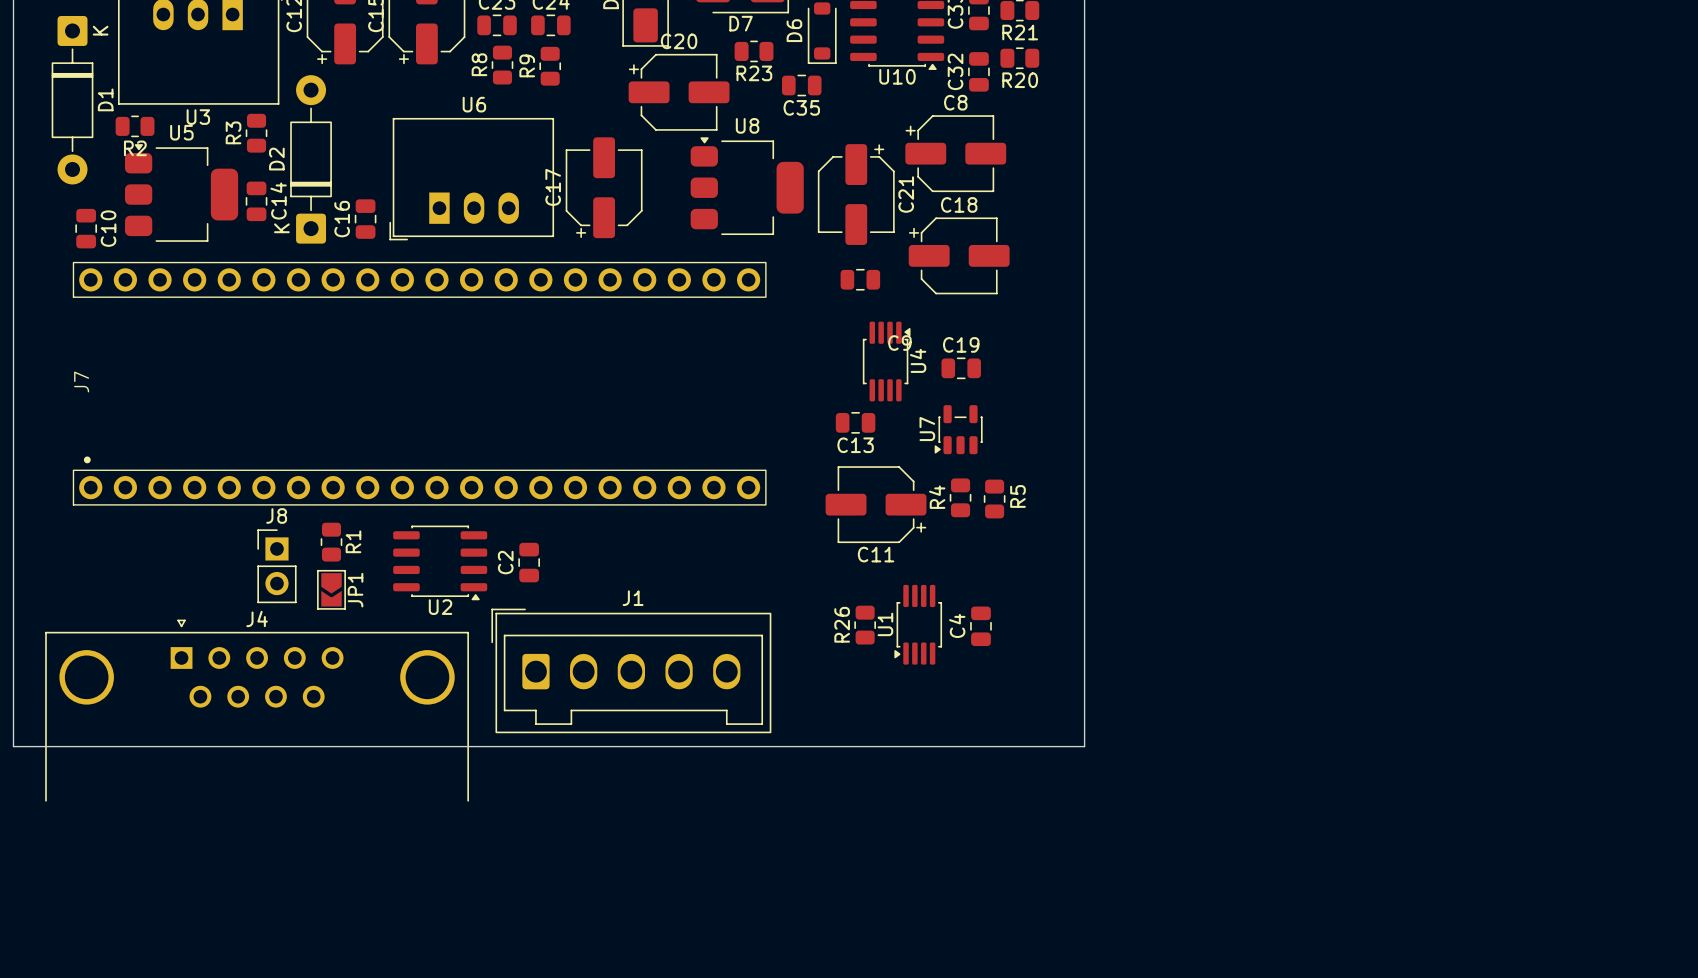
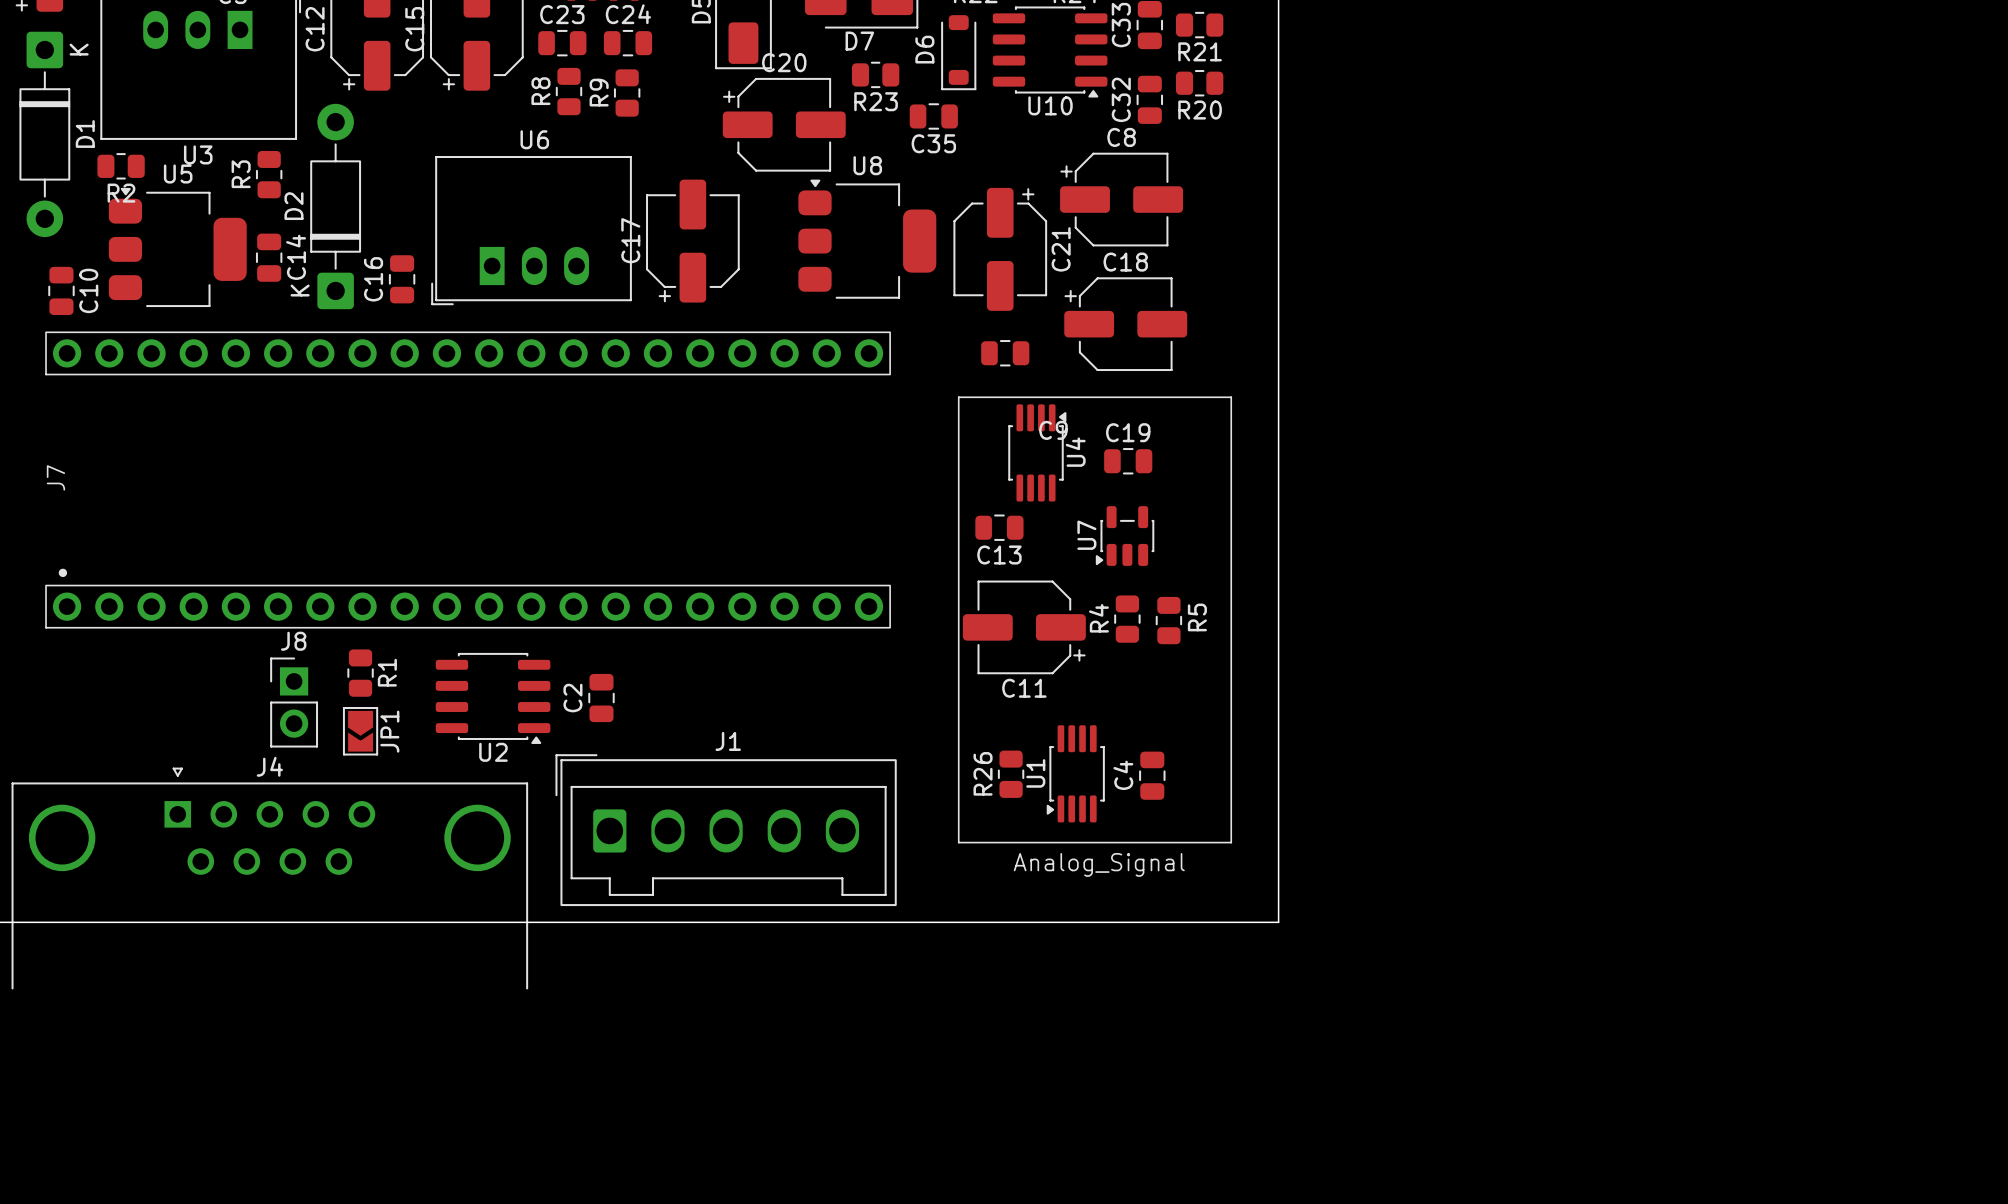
line: none -> (958, 397) (1231, 397) (1231, 842) (958, 842) (958, 397)
text: none -> Analog_Signal (1099, 864)

